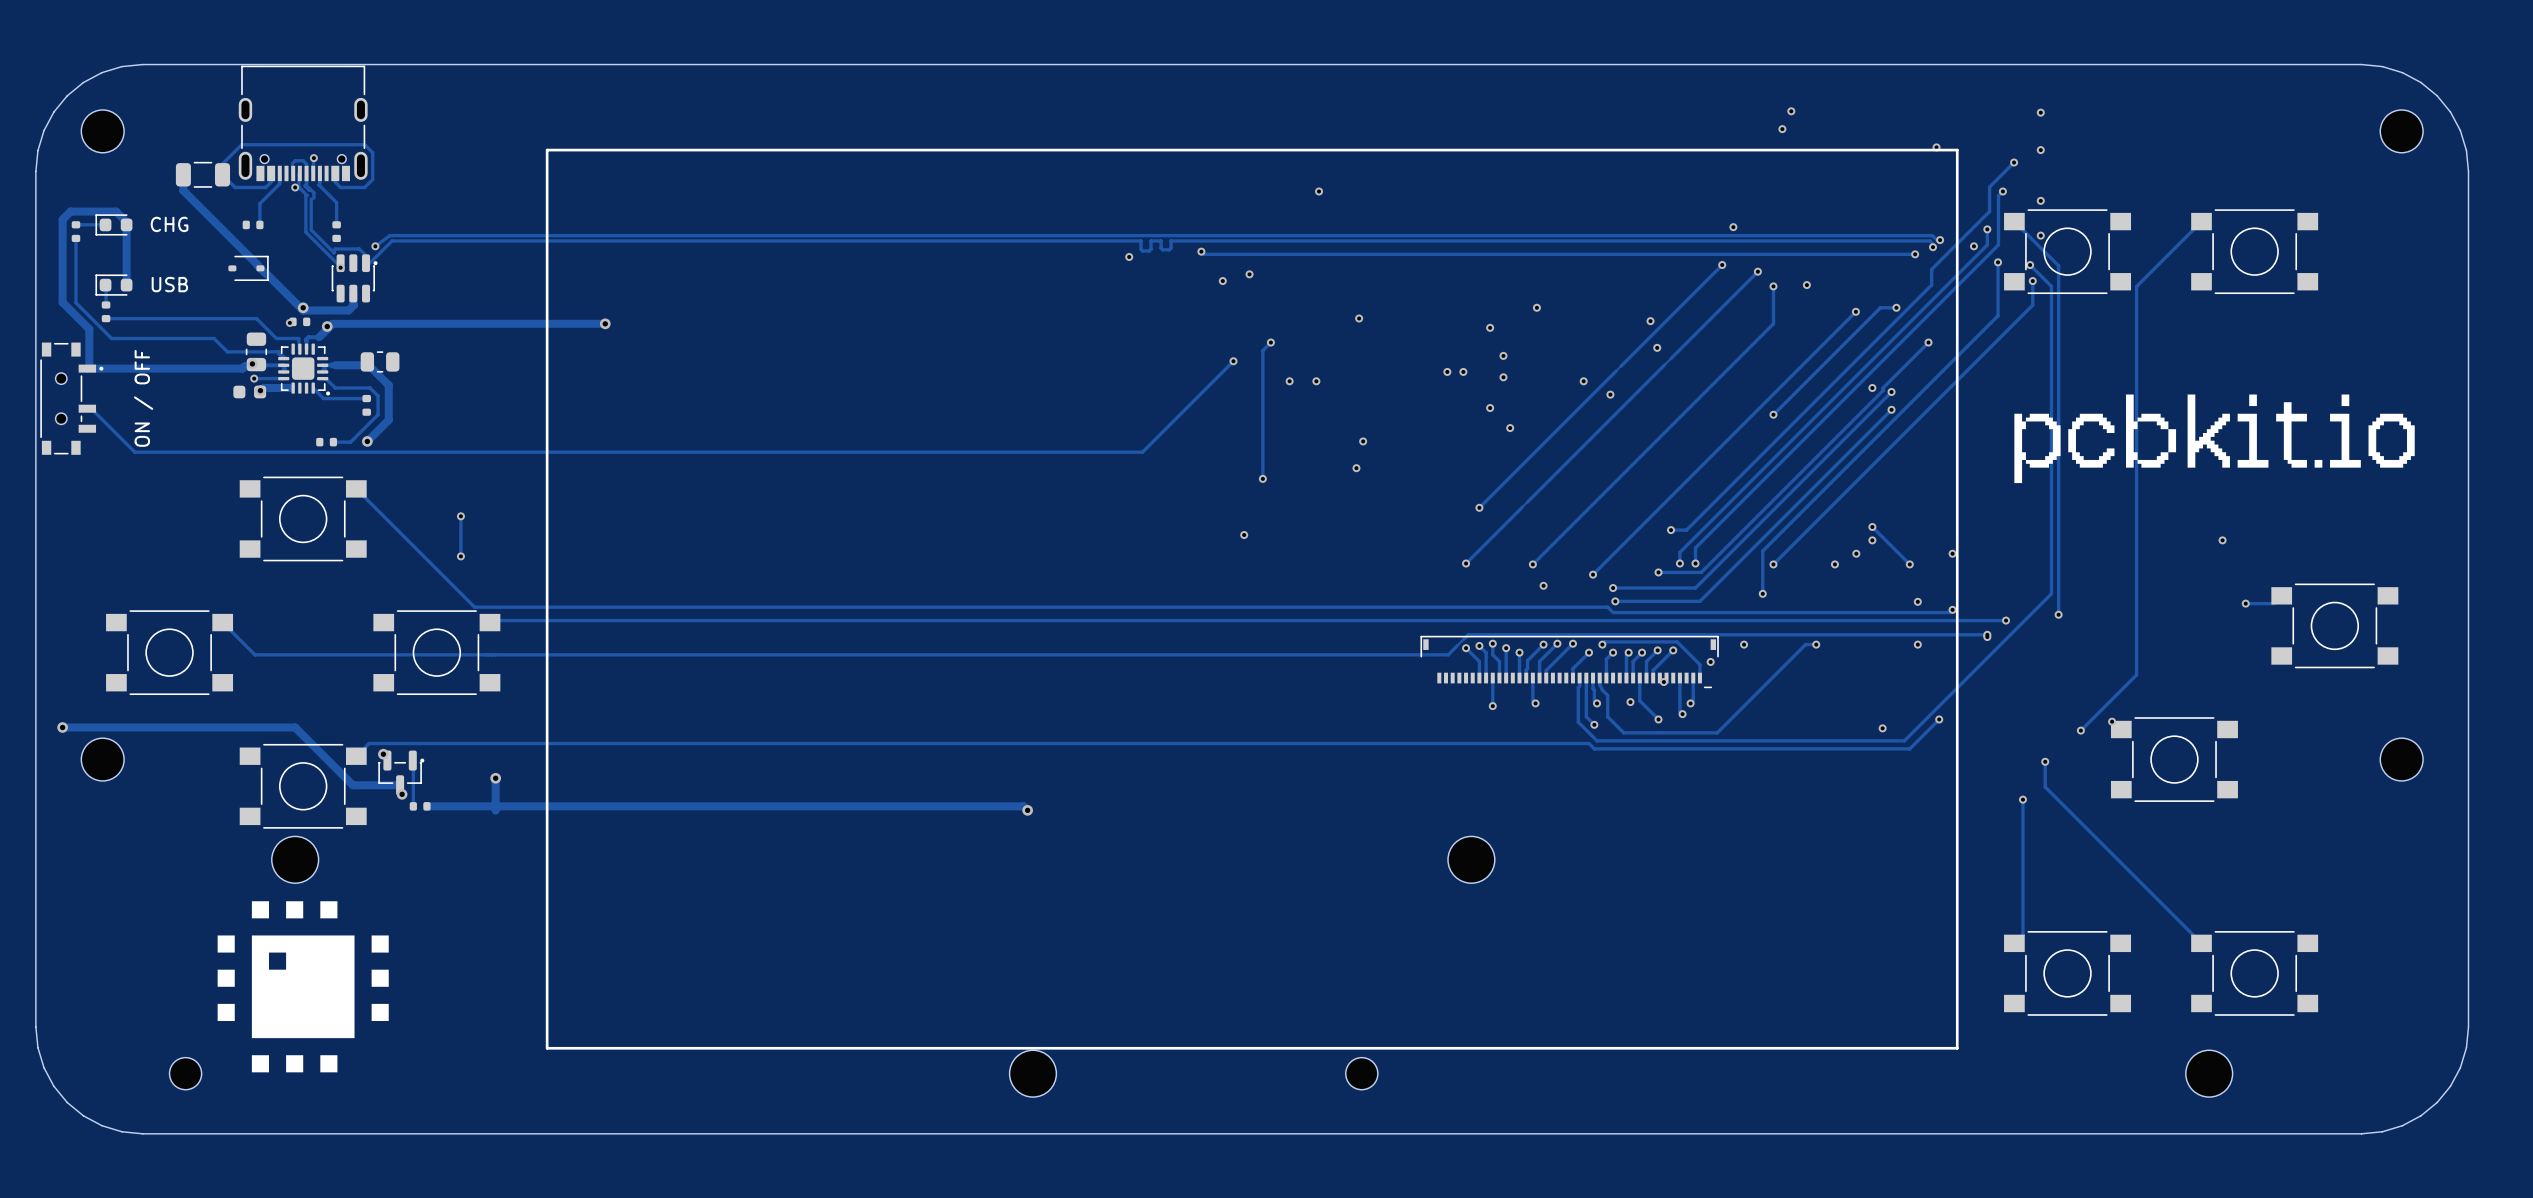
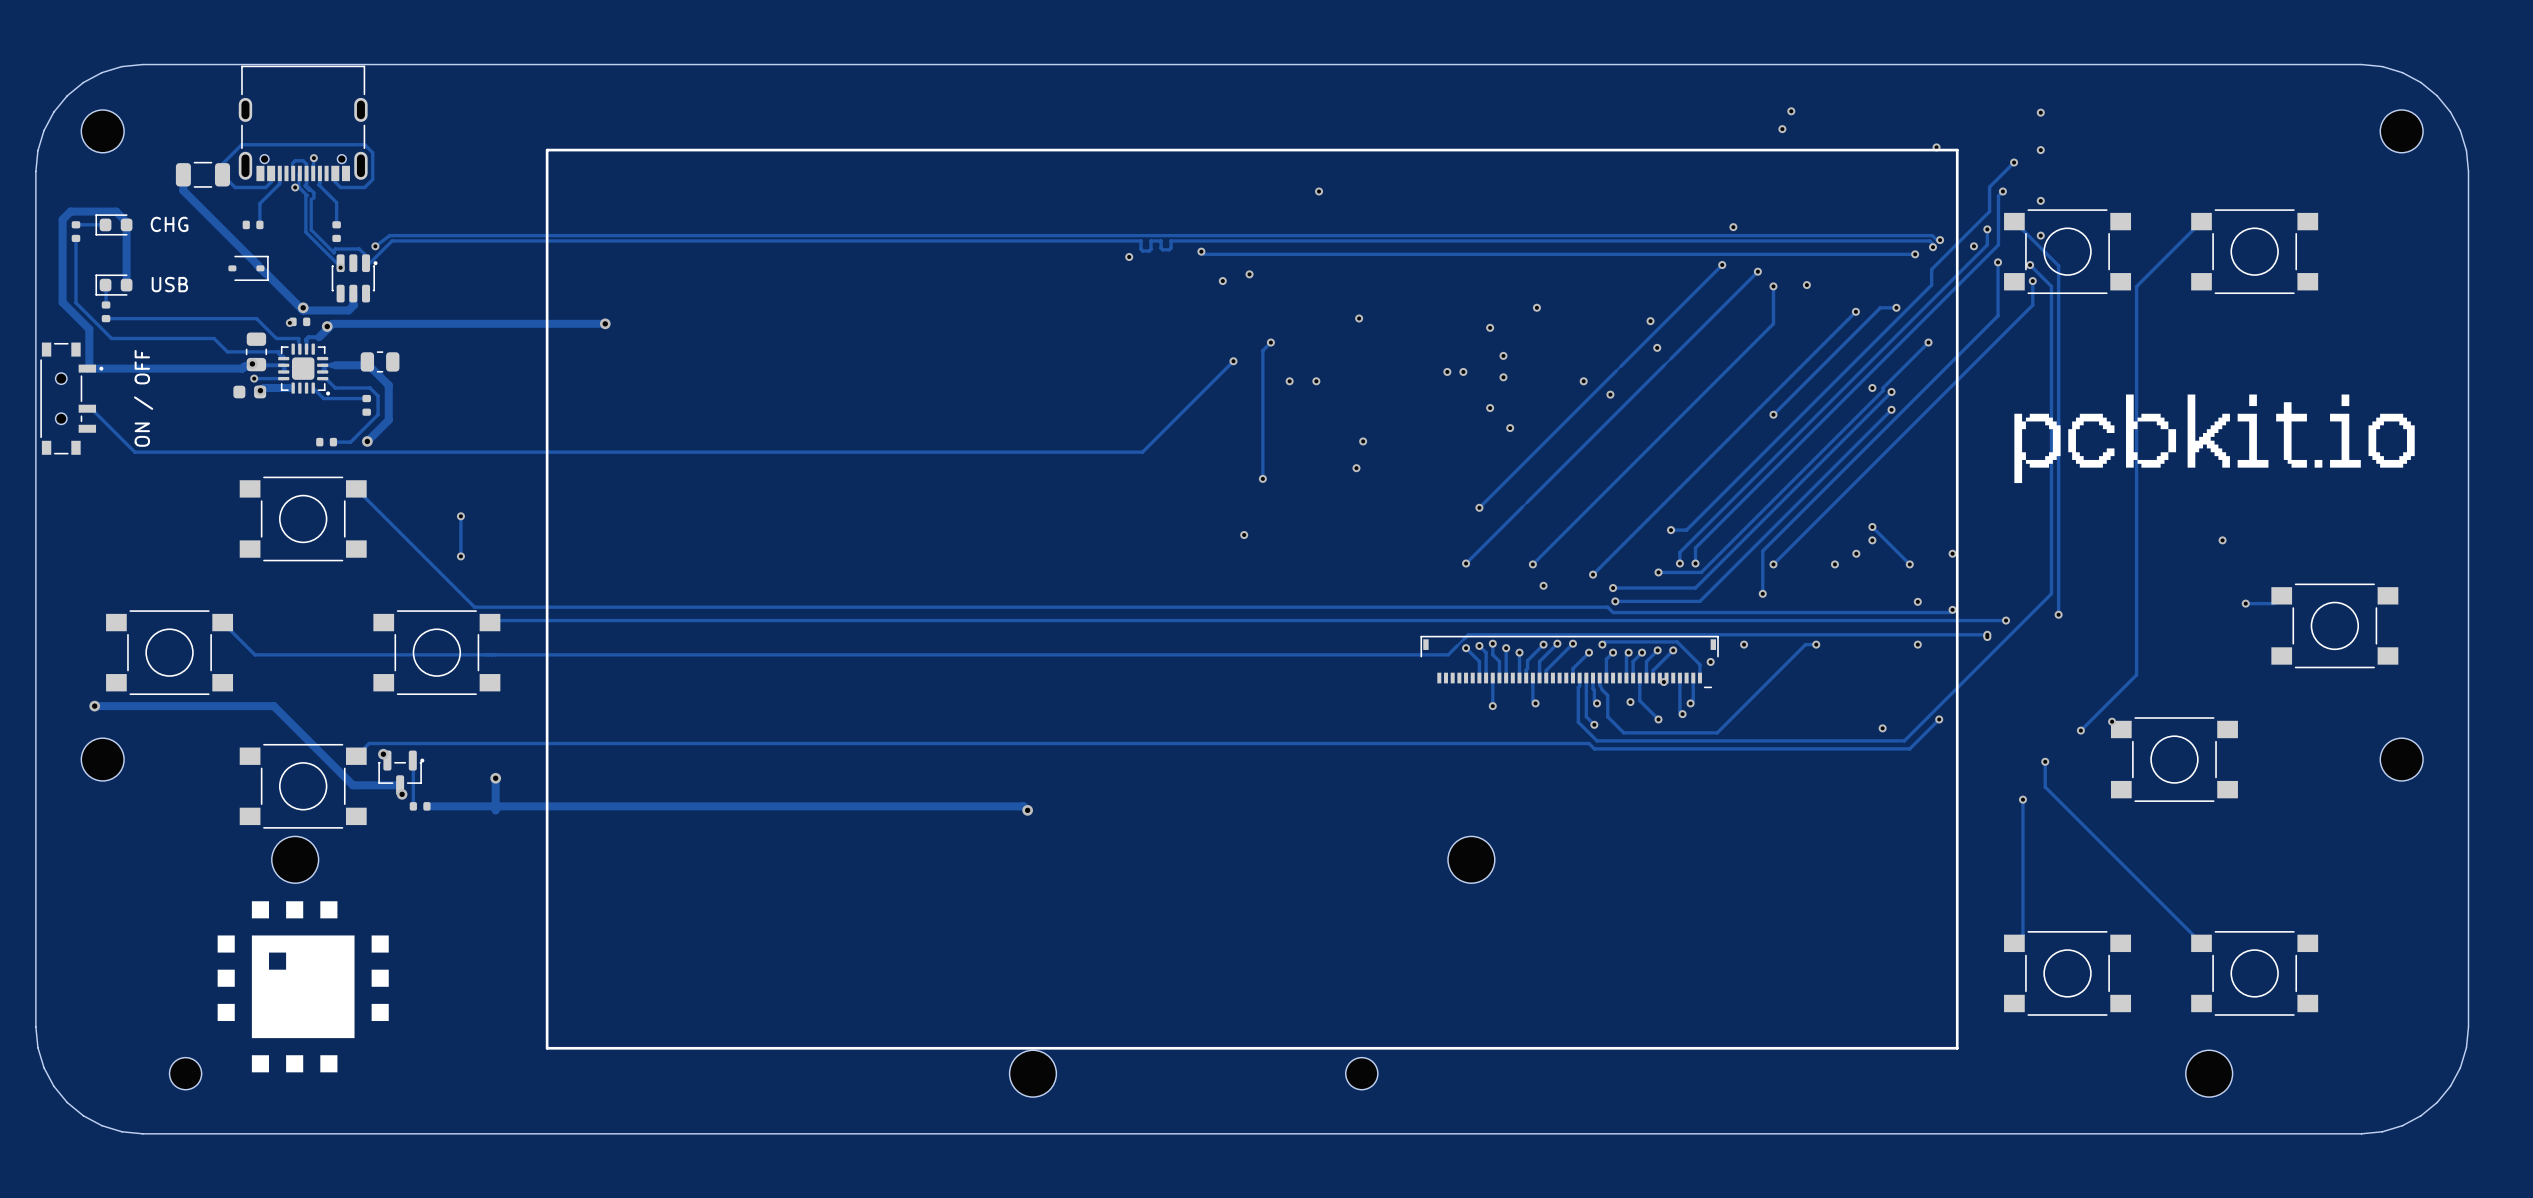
track: (62, 727) (295, 727) -> (94, 706) (273, 706) (295, 727)
via position: (62, 727) -> (94, 706)

